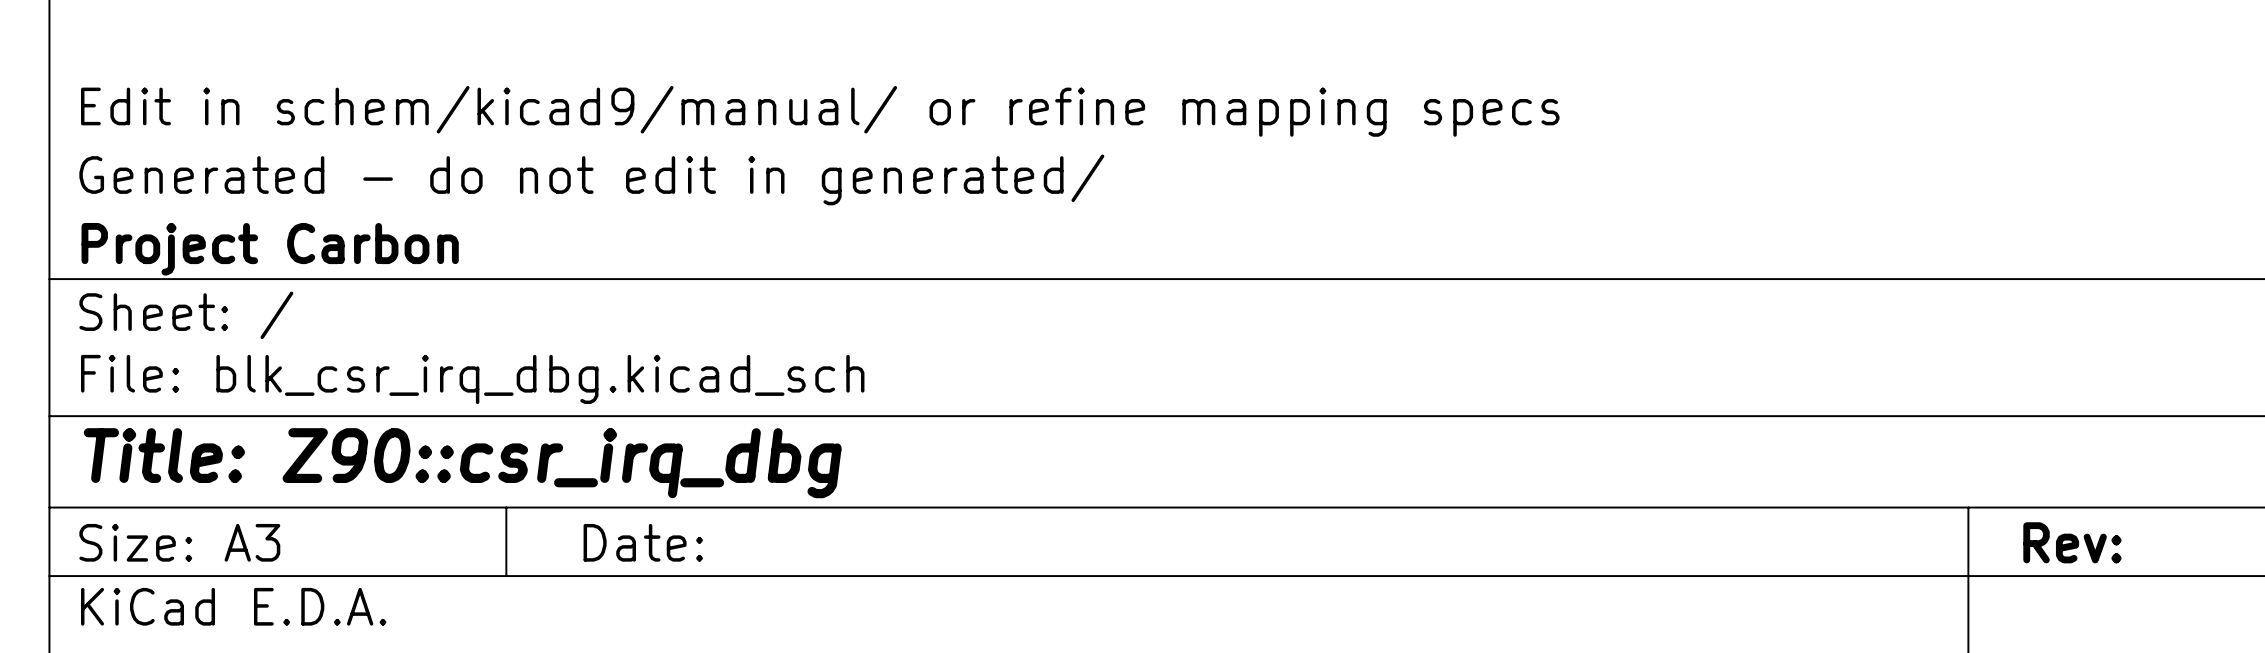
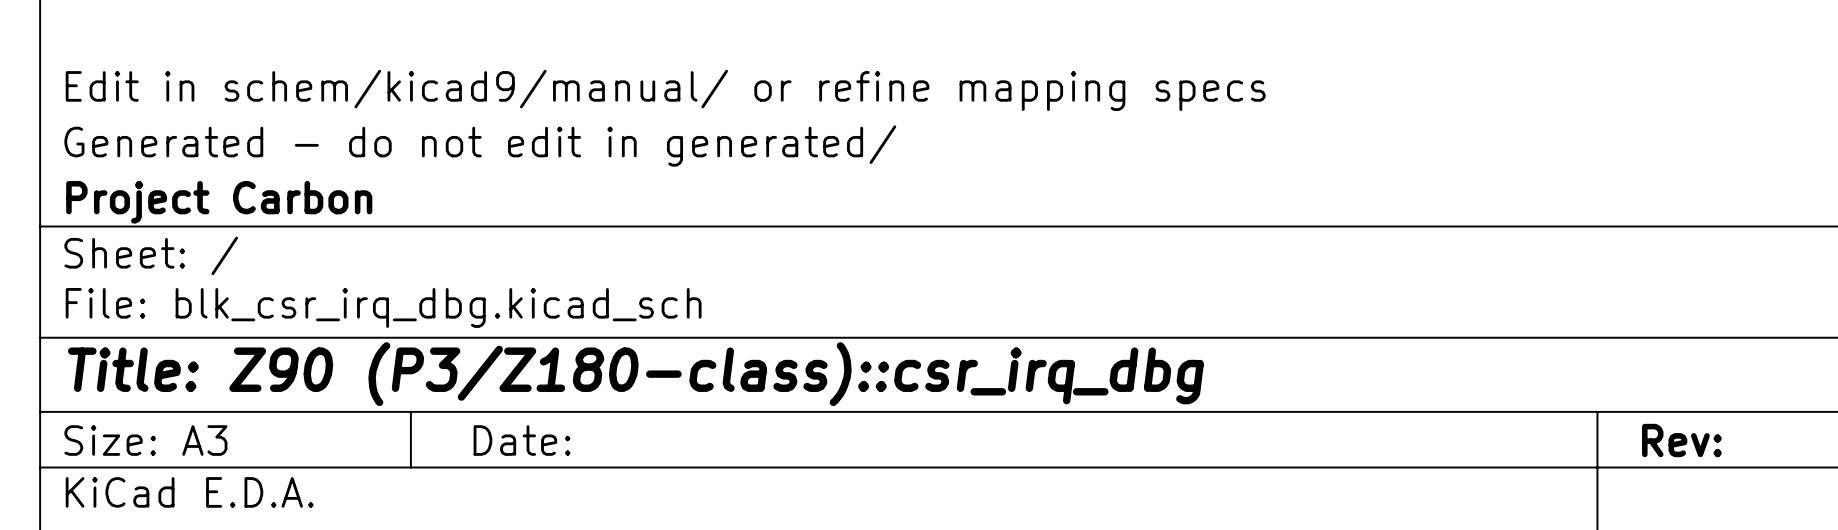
title block: Title: Z90::csr_irq_dbg (462, 463) -> Title: Z90 (P3/Z180-class)::csr_irq_dbg (635, 374)

